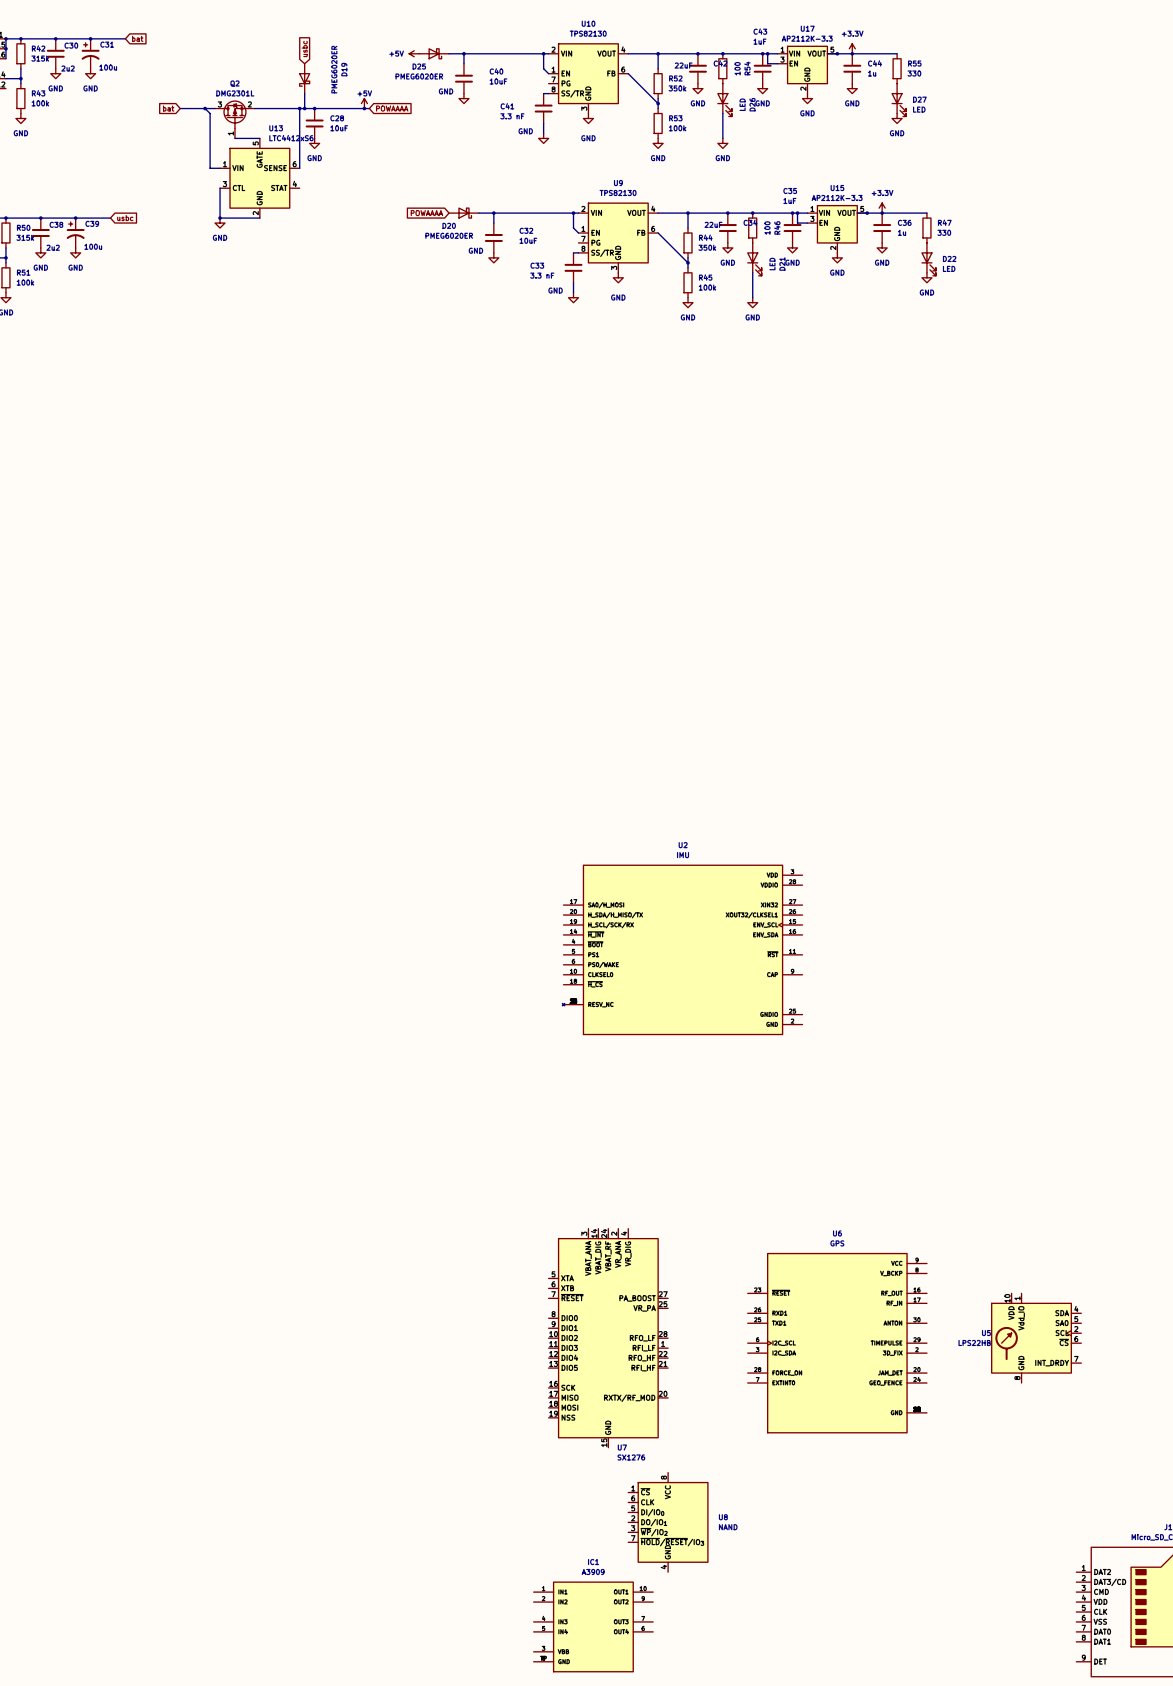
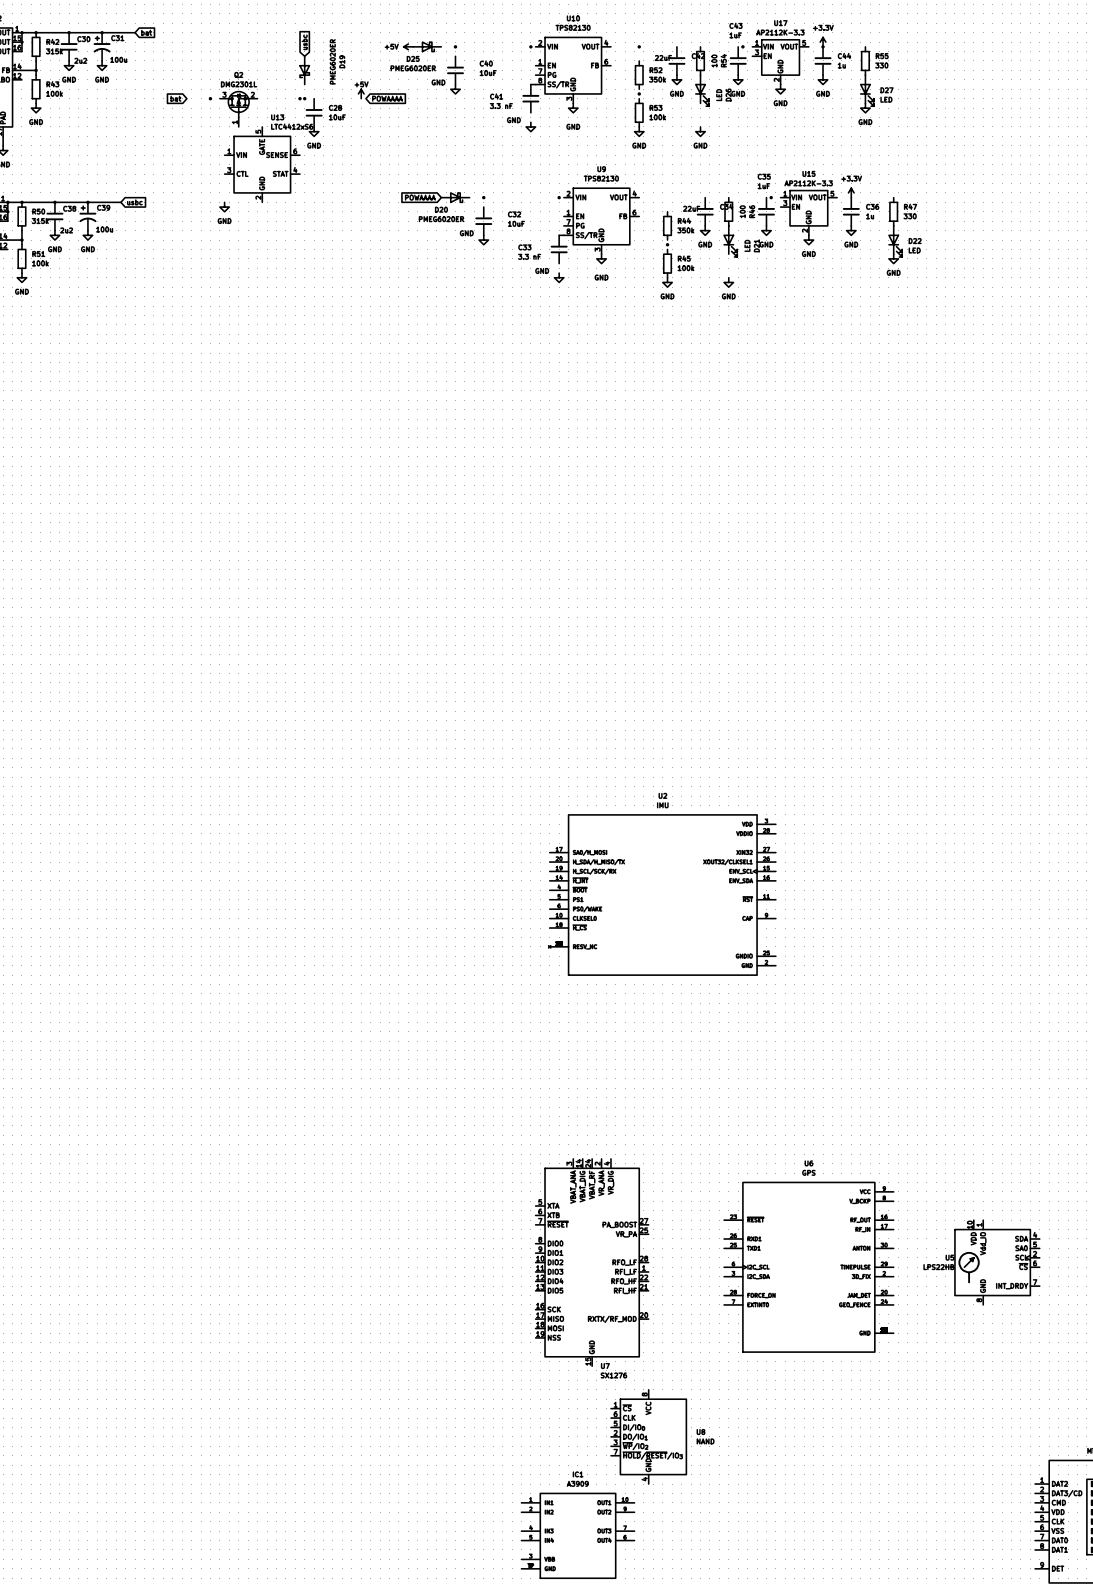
wire: (449, 53) (548, 53) -> none
wire: (463, 53) (463, 63) -> none
wire: (543, 53) (543, 68) (548, 73) -> none
wire: (628, 53) (777, 53) -> none
wire: (658, 53) (658, 68) -> none
junction: (697, 53) -> none
junction: (722, 53) -> none
junction: (762, 53) -> none
wire: (767, 53) (767, 63) (777, 63) -> none
wire: (827, 53) (897, 53) -> none
junction: (837, 53) -> none
wire: (628, 73) (658, 103) -> none
wire: (304, 93) (304, 108) -> none
wire: (658, 98) (658, 108) -> none
wire: (180, 108) (215, 108) -> none
wire: (205, 108) (210, 113) (210, 168) (220, 168) -> none
wire: (254, 108) (369, 108) -> none
wire: (299, 108) (299, 168) -> none
junction: (314, 108) -> none
junction: (364, 108) -> none
wire: (722, 113) (722, 138) -> none
wire: (543, 123) (543, 133) -> none
wire: (234, 138) (259, 138) -> none
wire: (220, 188) (220, 218) (259, 218) -> none
wire: (478, 213) (578, 213) -> none
wire: (493, 213) (493, 223) -> none
wire: (573, 213) (573, 228) (578, 233) -> none
wire: (658, 213) (807, 213) -> none
wire: (688, 213) (688, 228) -> none
junction: (688, 213) -> none
junction: (727, 213) -> none
junction: (752, 213) -> none
junction: (792, 213) -> none
wire: (797, 213) (797, 223) (807, 223) -> none
wire: (857, 213) (926, 213) -> none
junction: (867, 213) -> none
junction: (882, 213) -> none
junction: (220, 218) -> none
wire: (658, 233) (688, 262) -> none
wire: (688, 257) (688, 267) -> none
wire: (752, 272) (752, 297) -> none
wire: (573, 282) (573, 292) -> none

